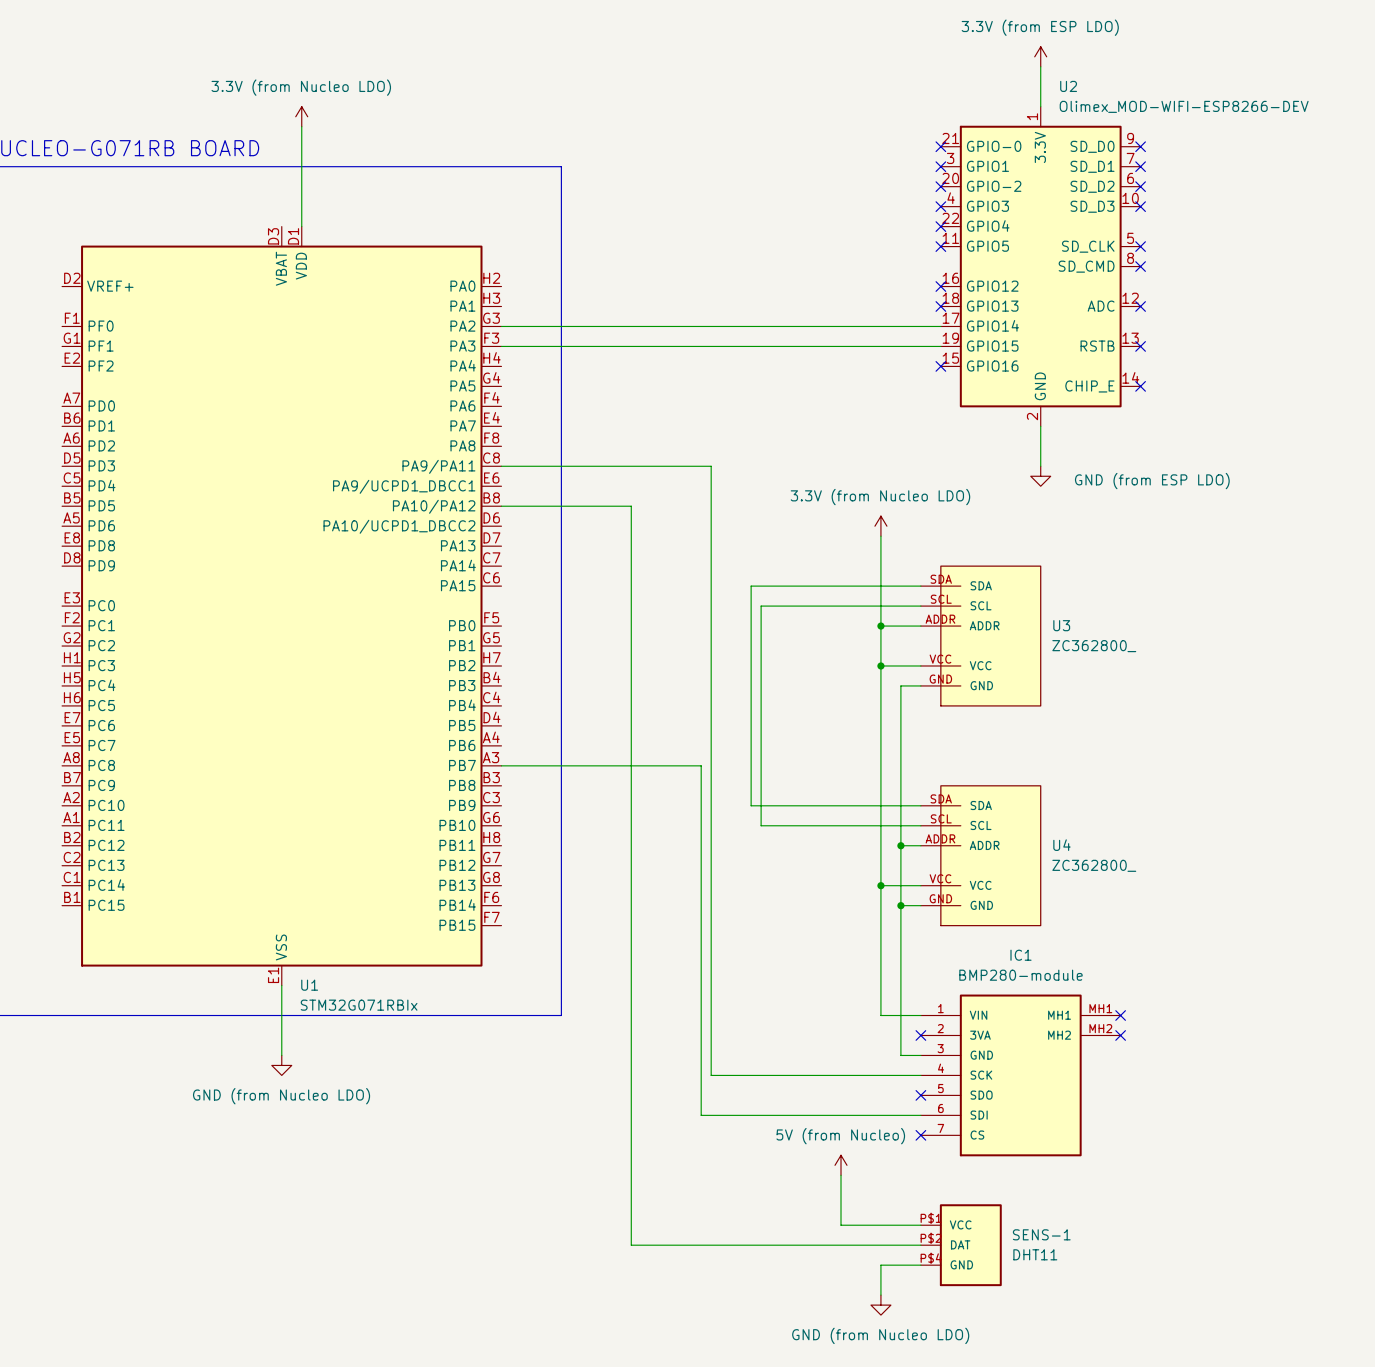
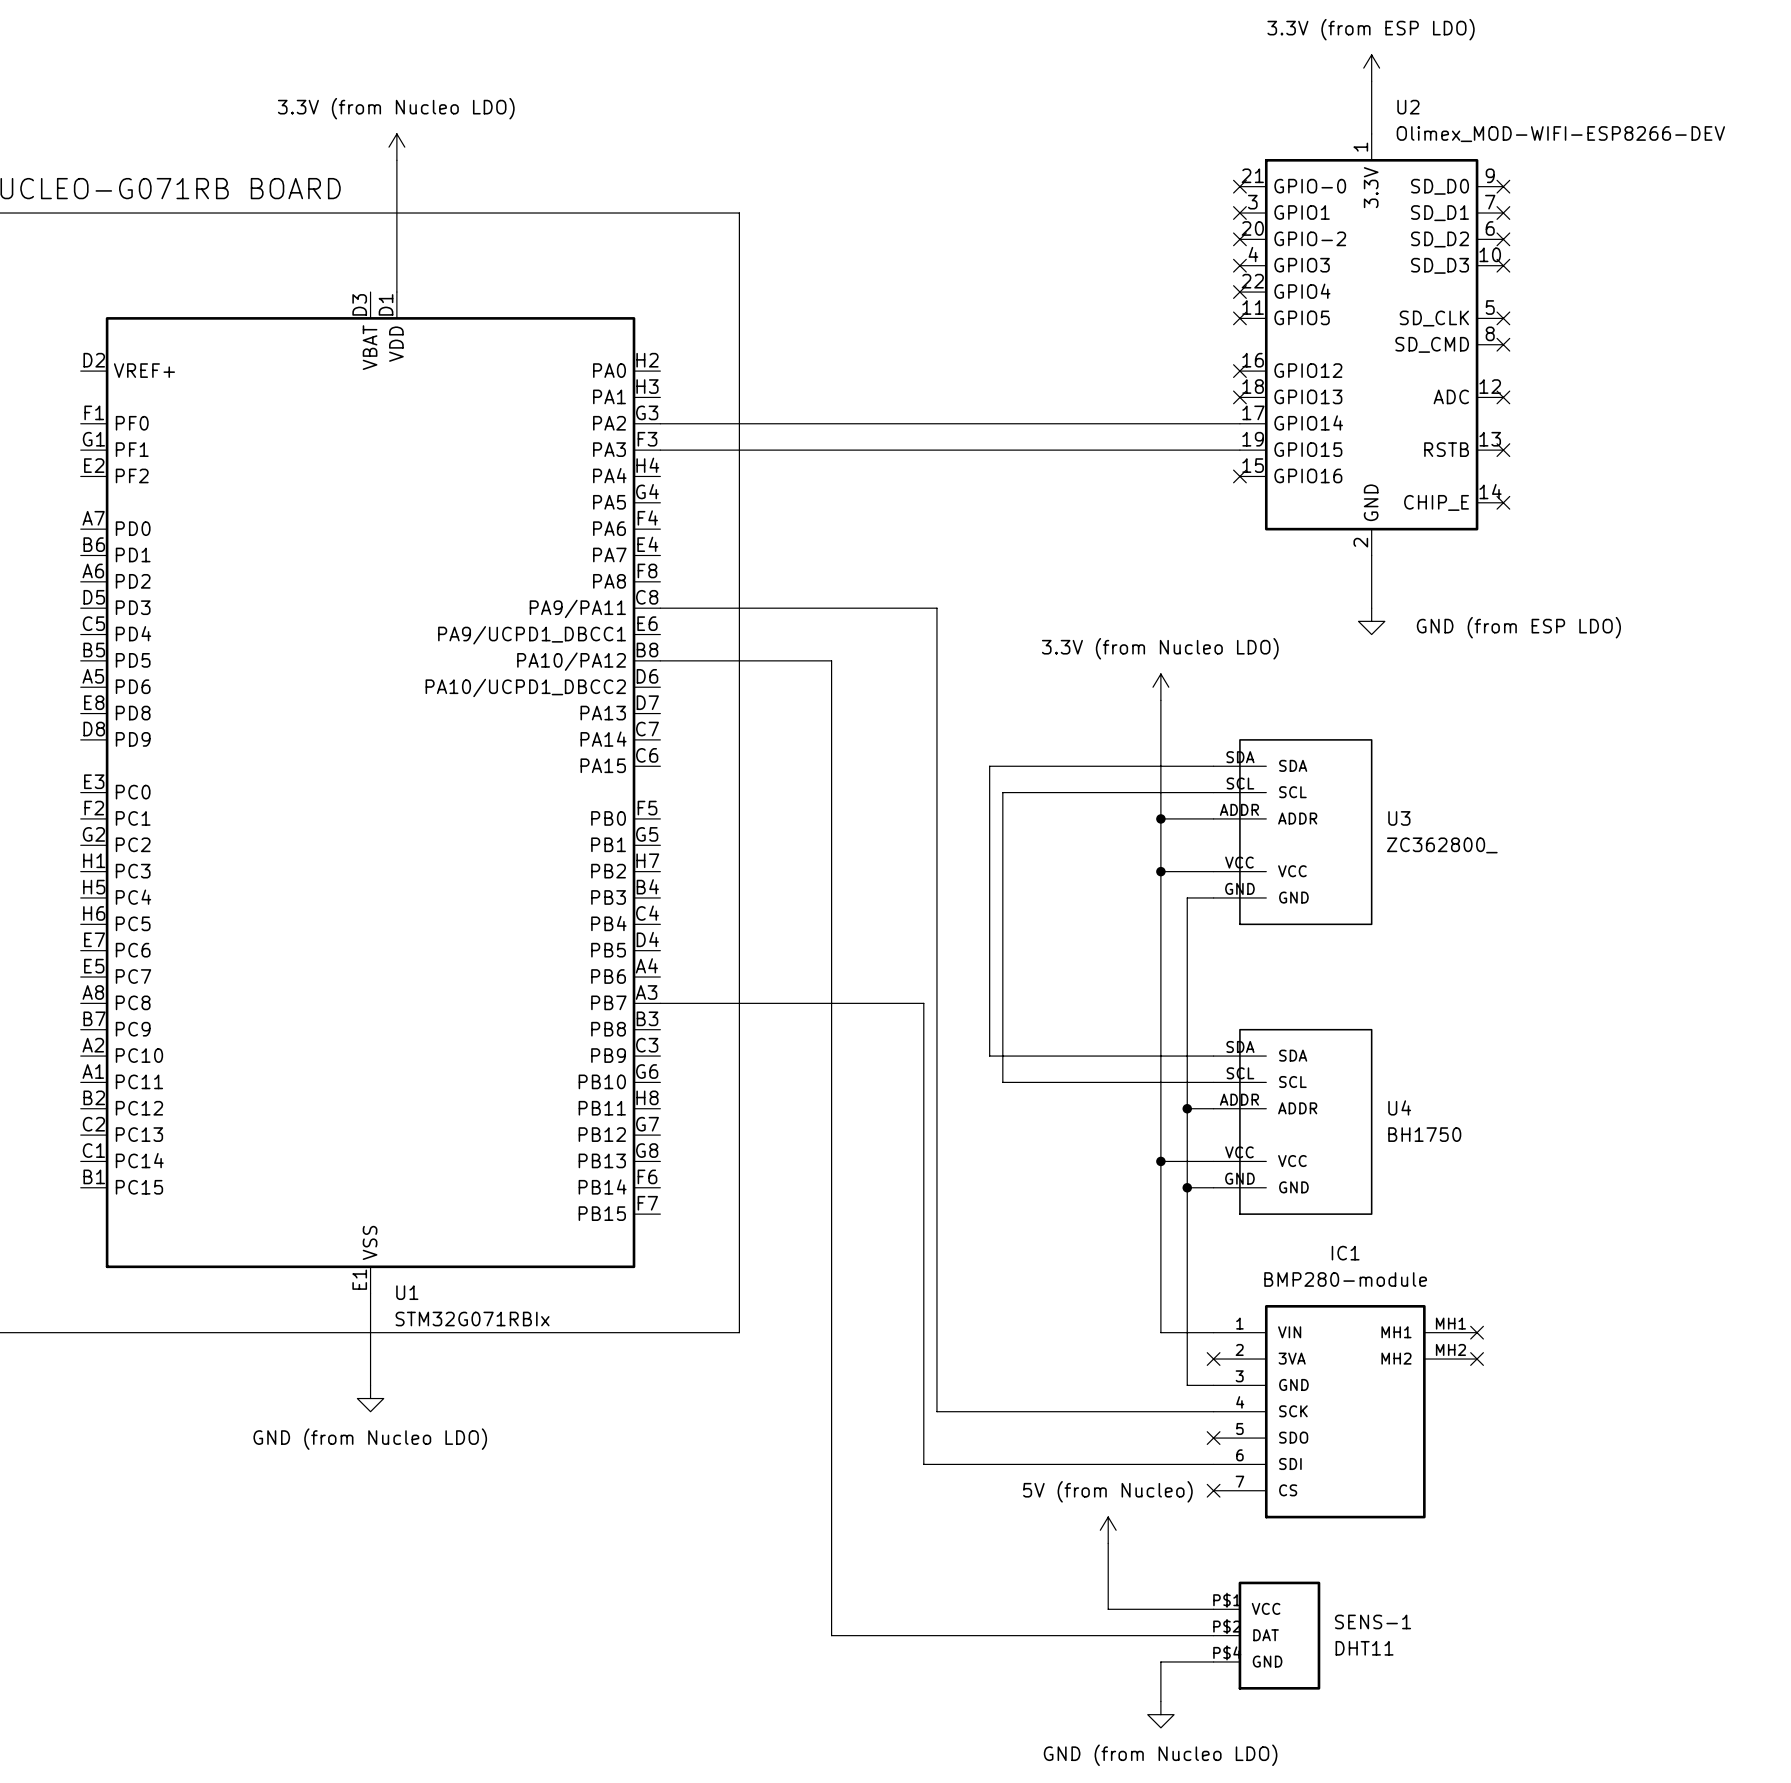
U4 value: ZC362800_ (1094, 865) -> BH1750 (1424, 1134)

